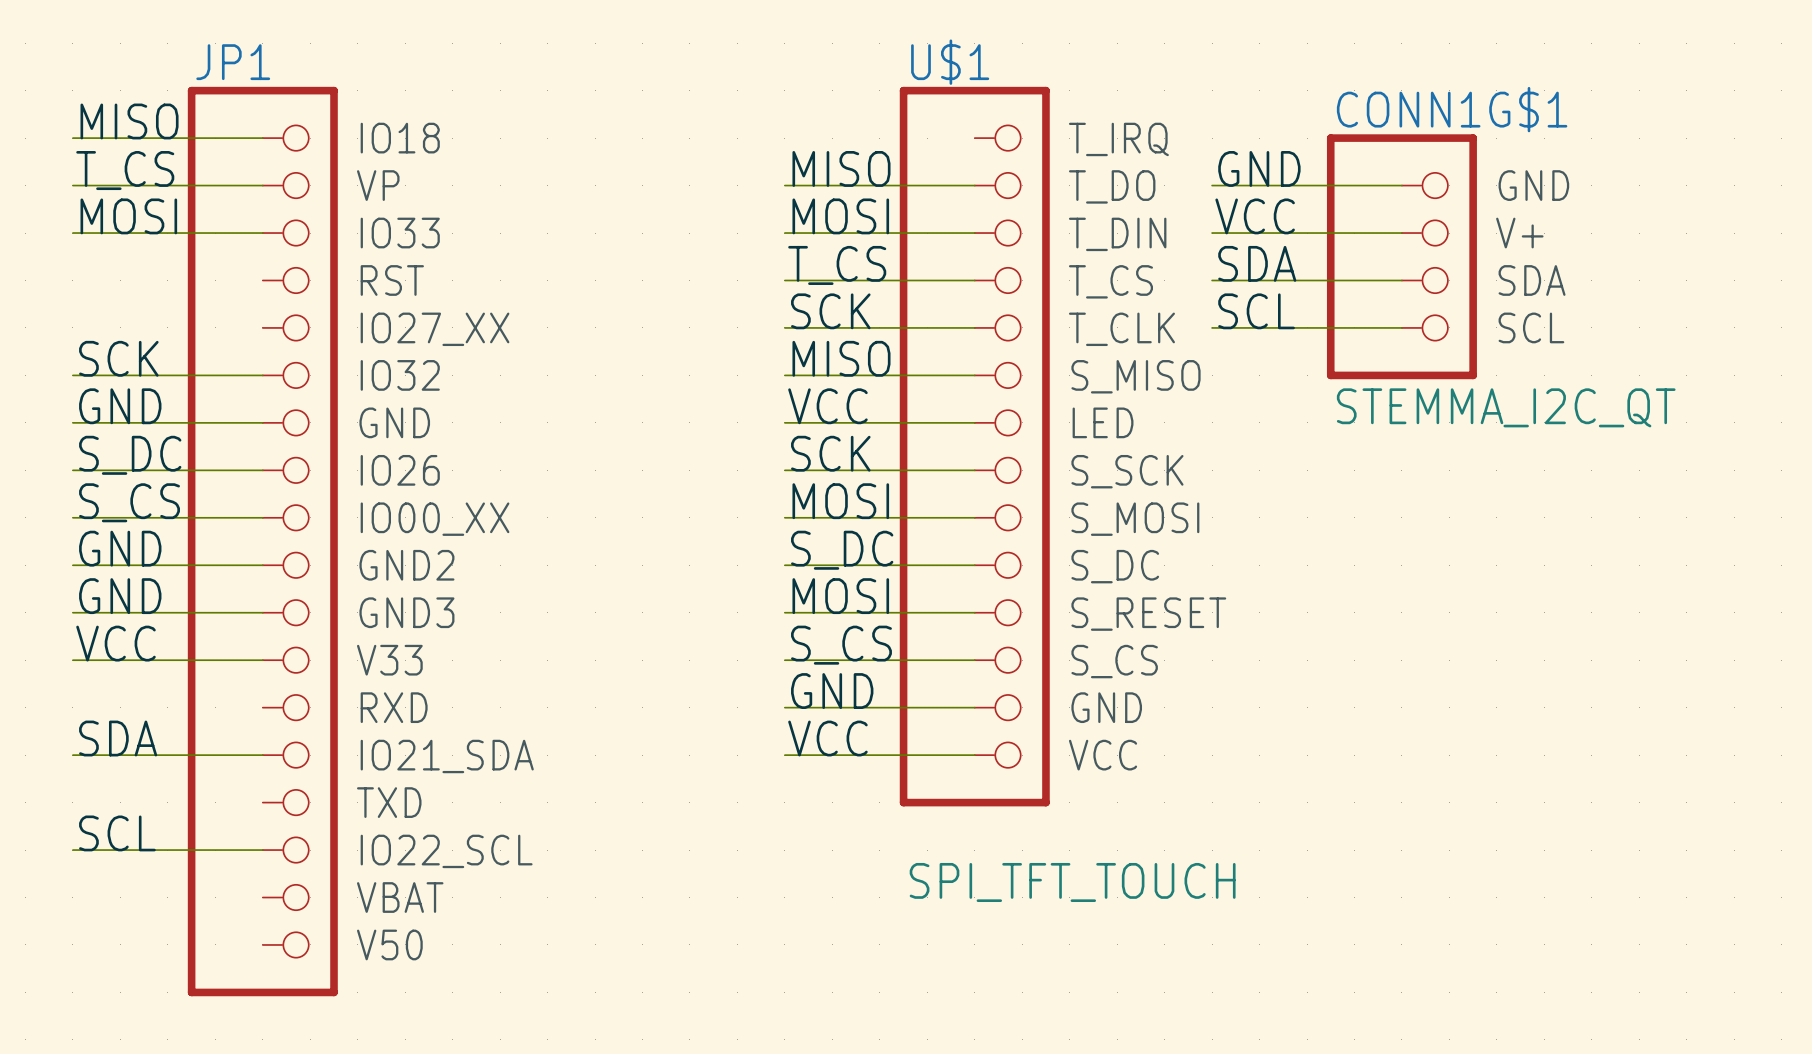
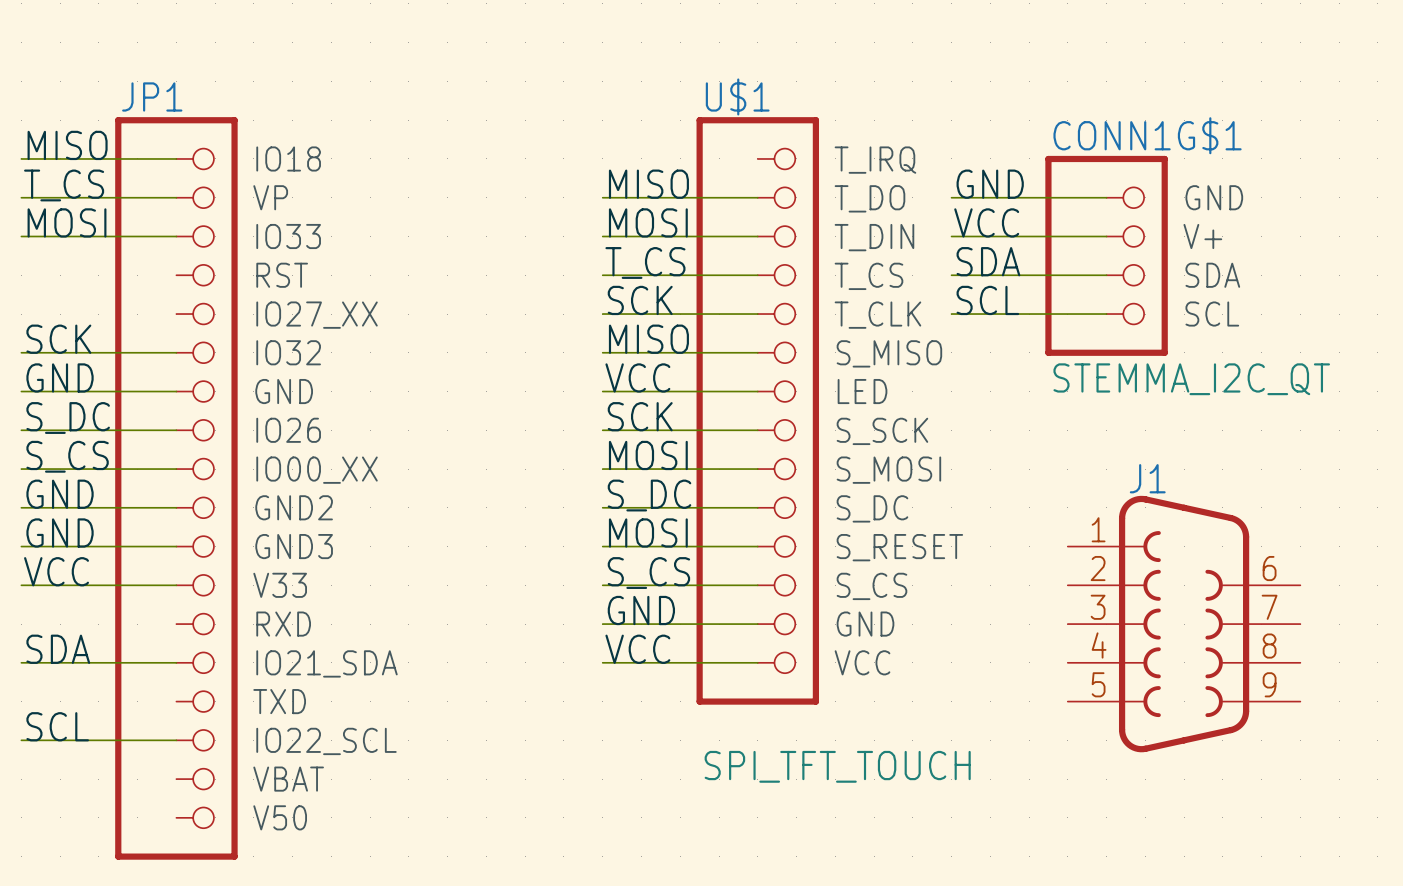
J1: none -> (1184, 624)

